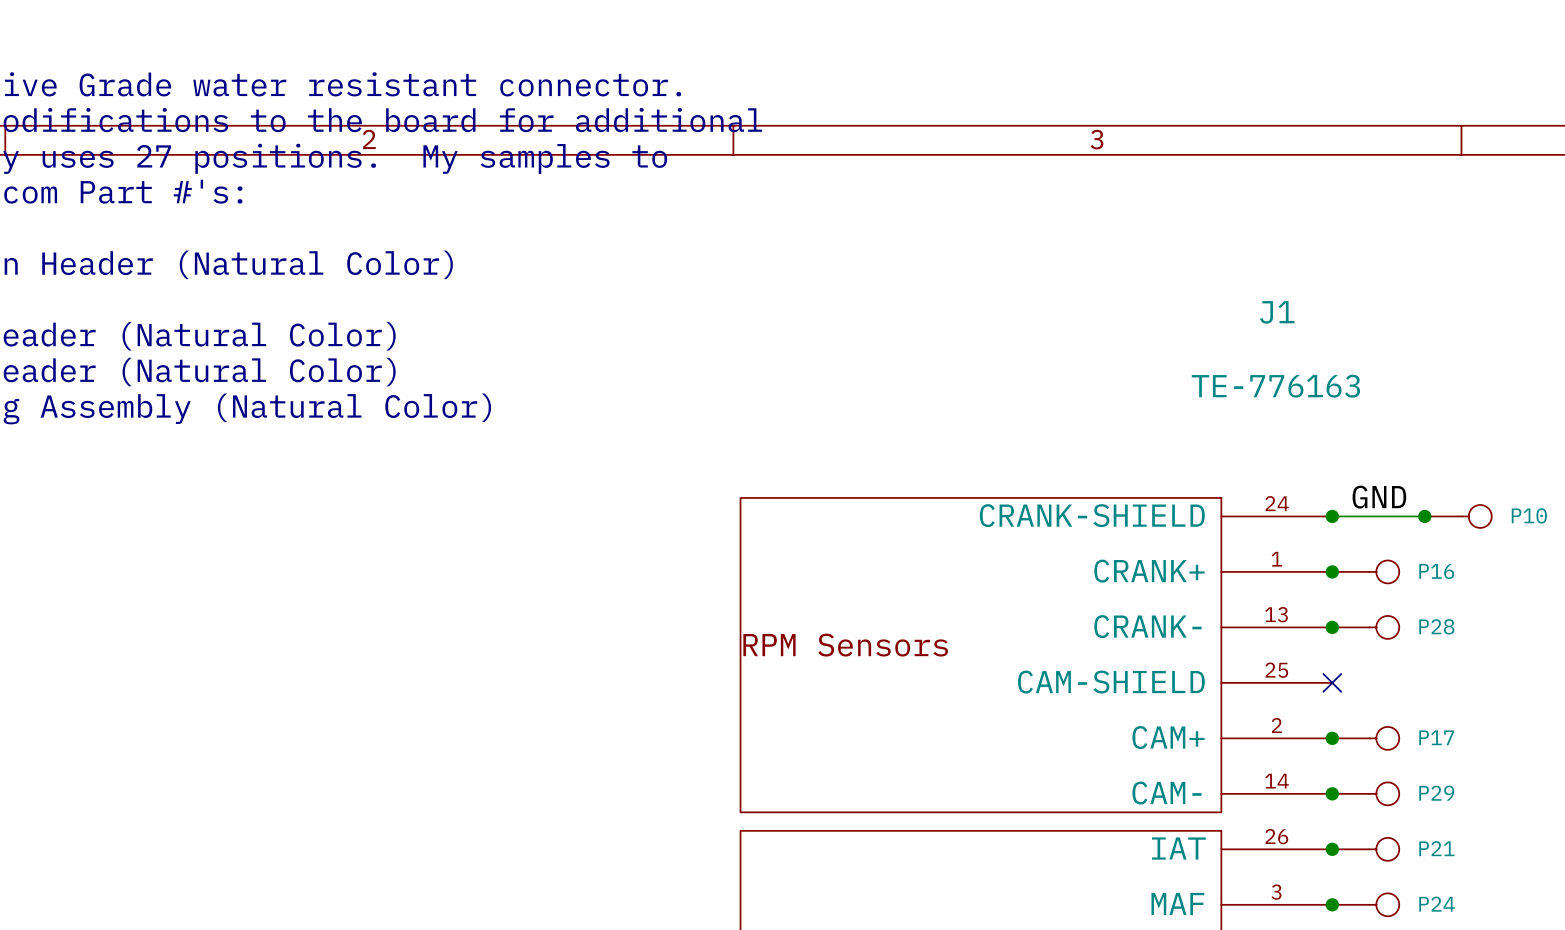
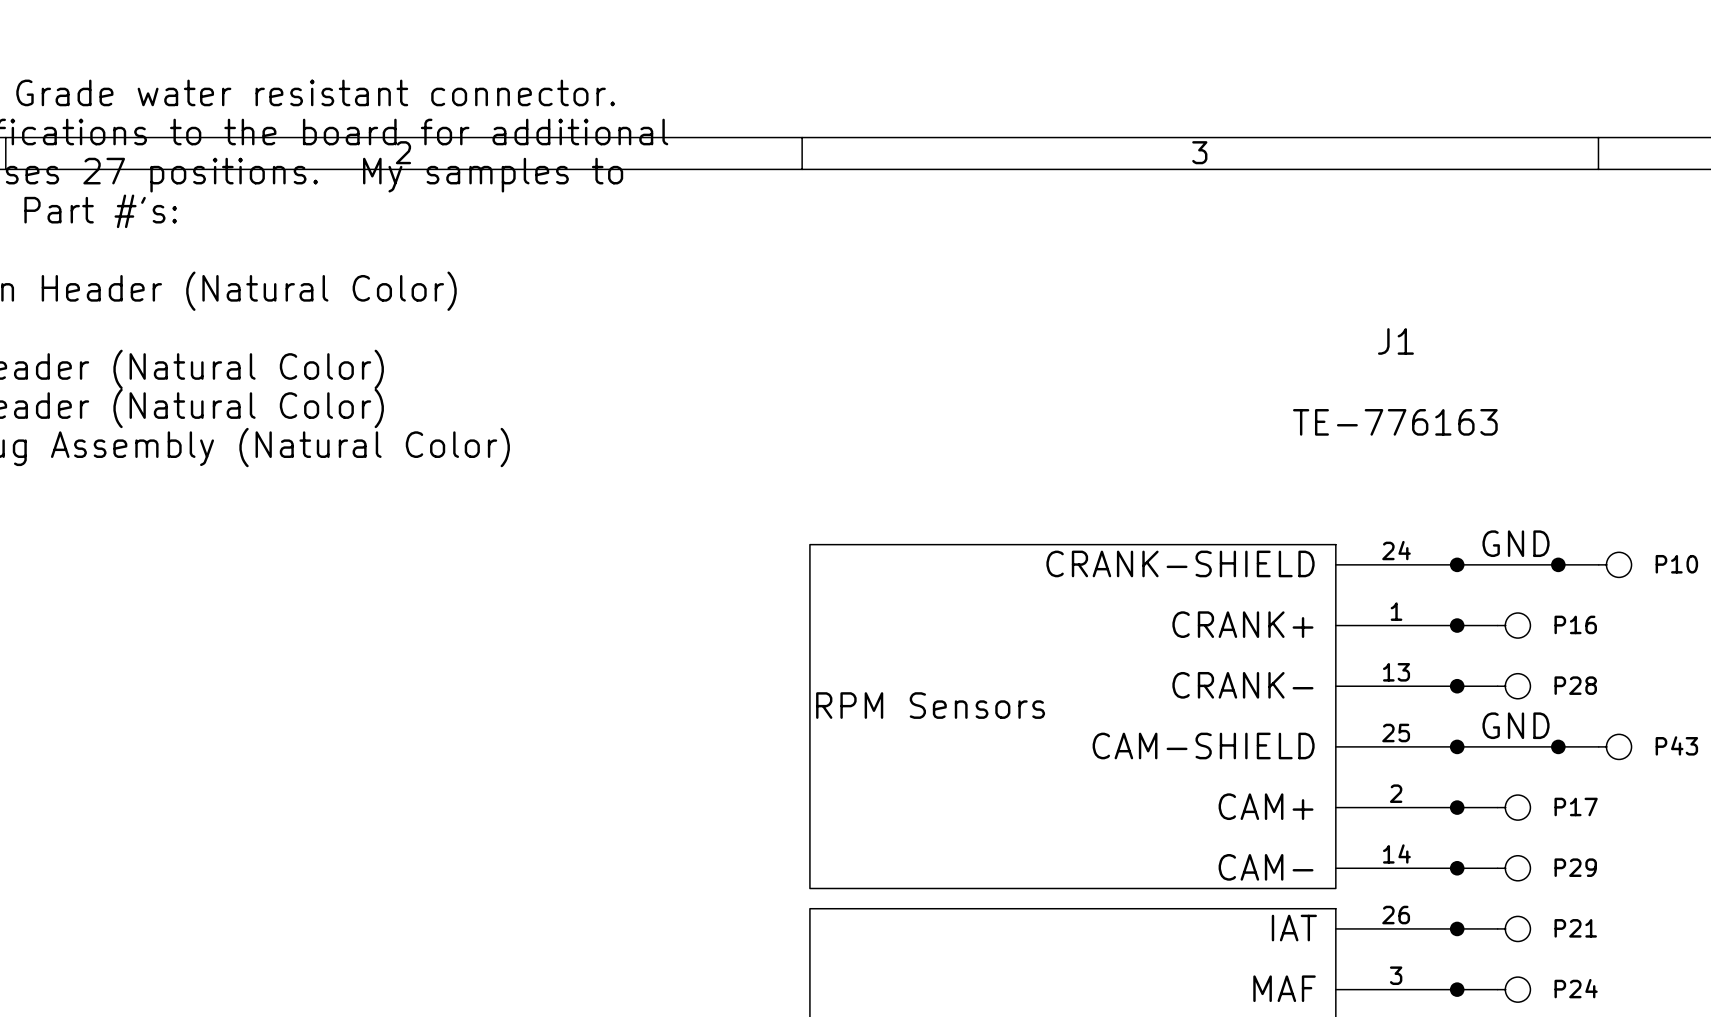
label: none -> GND (1516, 725)
wire: none -> (1457, 746) (1558, 746)
no-connect mark: (1332, 682) -> none
junction: none -> (1457, 746)
junction: none -> (1558, 746)
P43: none -> (1594, 746)

